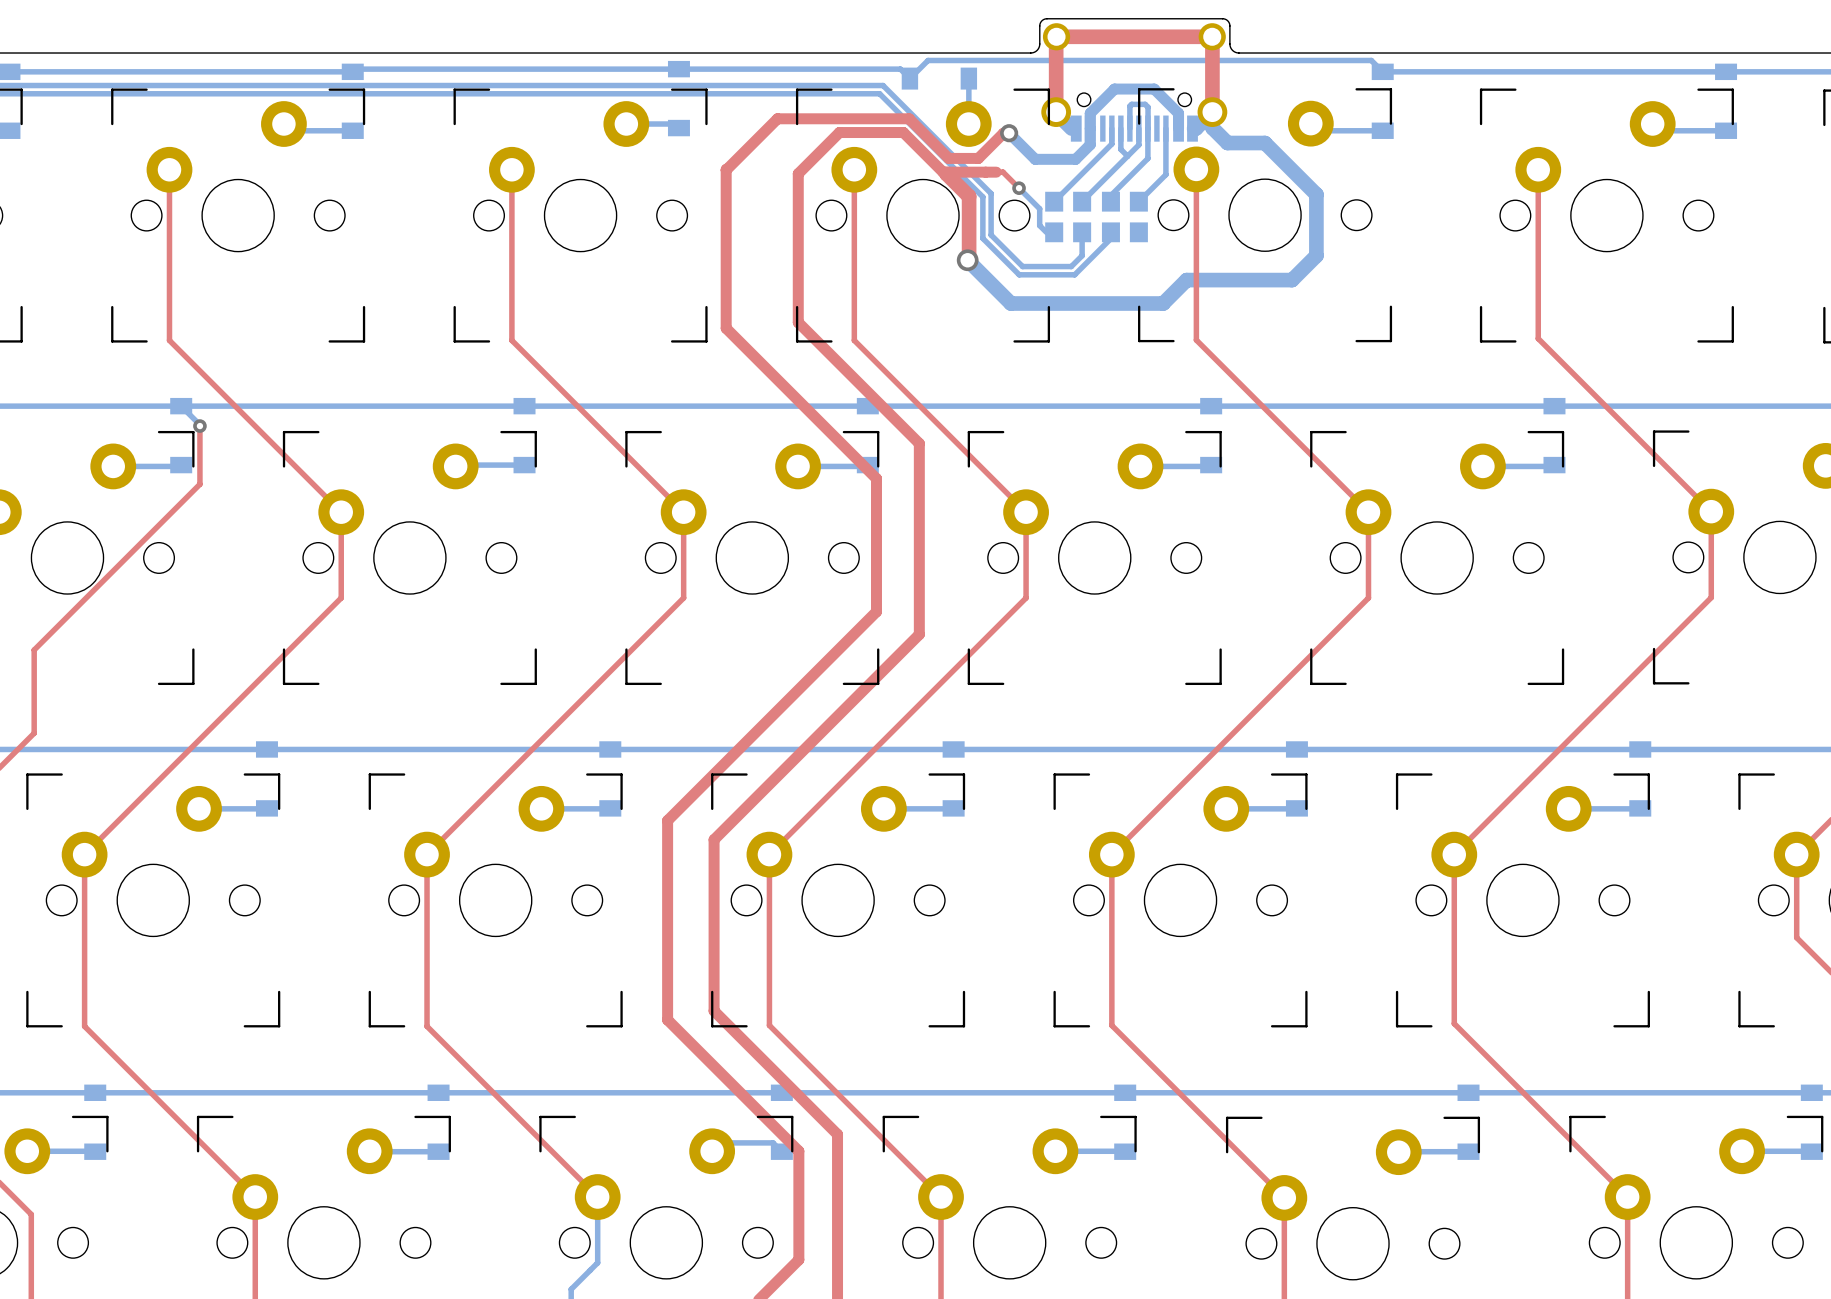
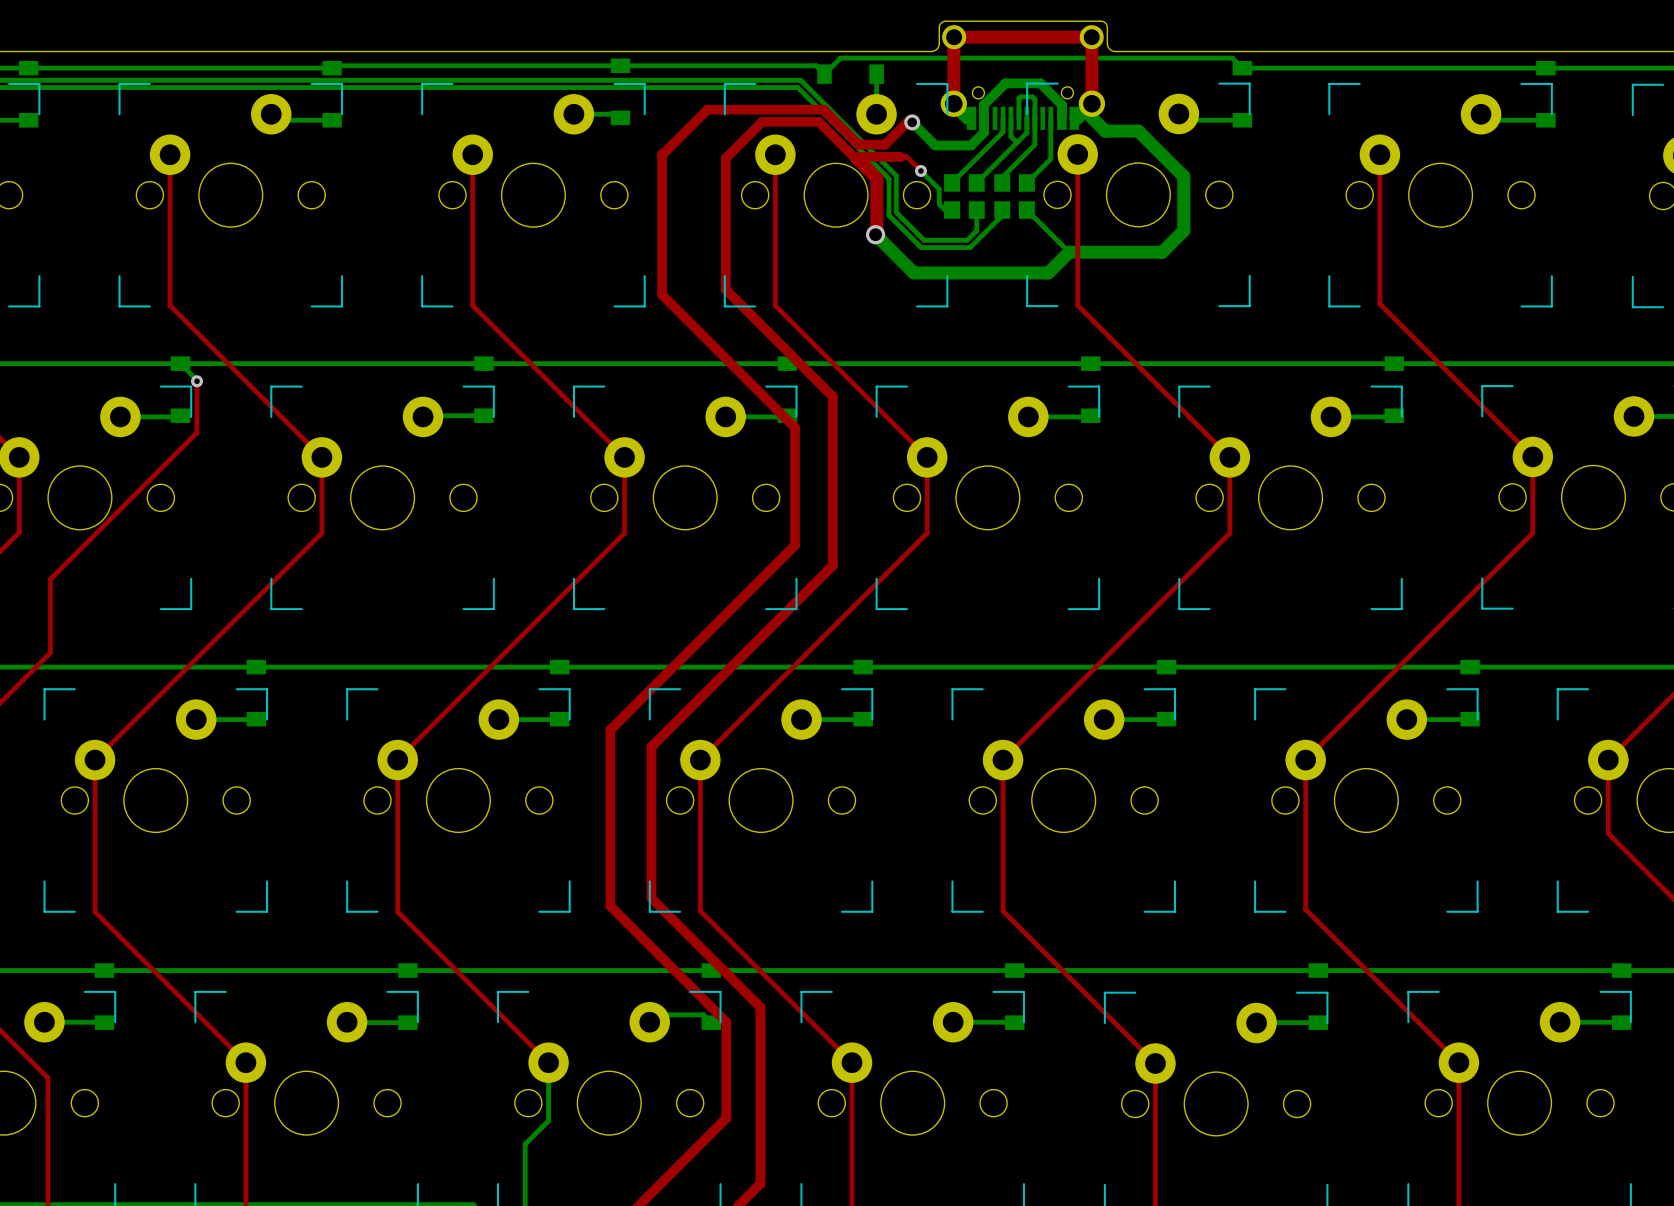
bottom track: none -> (1026, 210) (1069, 252)

